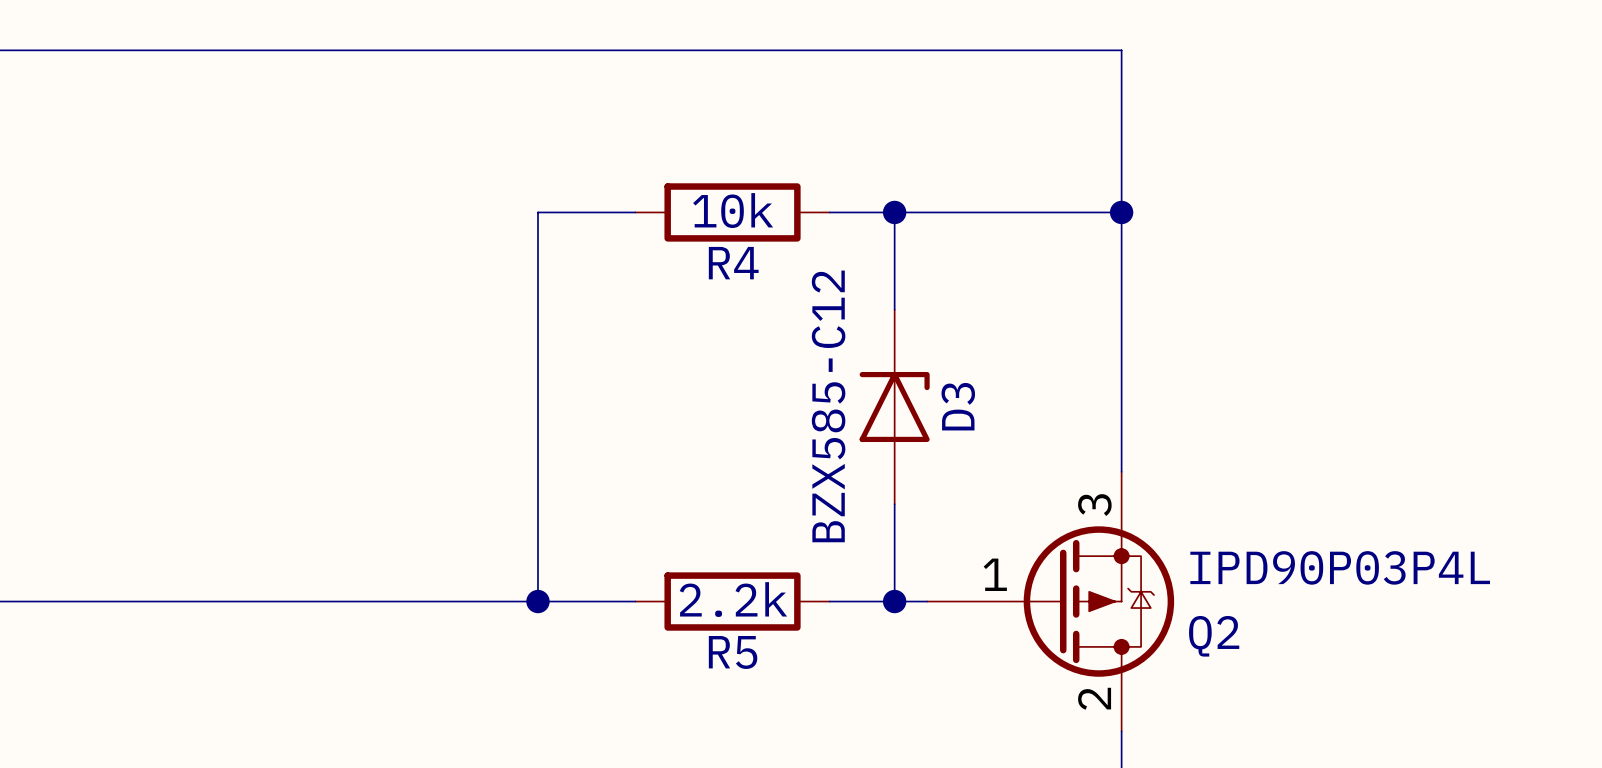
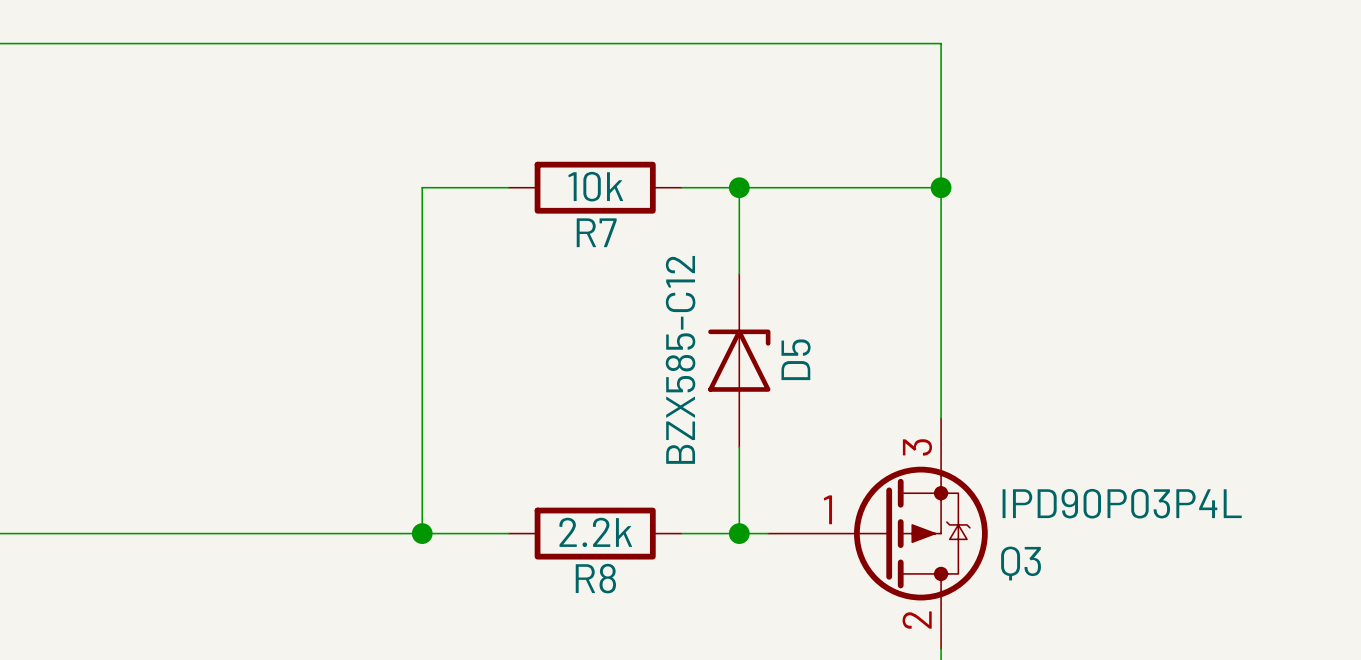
R4 name: R4 (733, 263) -> R7 (596, 232)
D3 name: D3 (958, 406) -> D5 (796, 359)
Q2 name: Q2 (1214, 636) -> Q3 (1021, 563)
R5 name: R5 (733, 652) -> R8 (595, 578)

